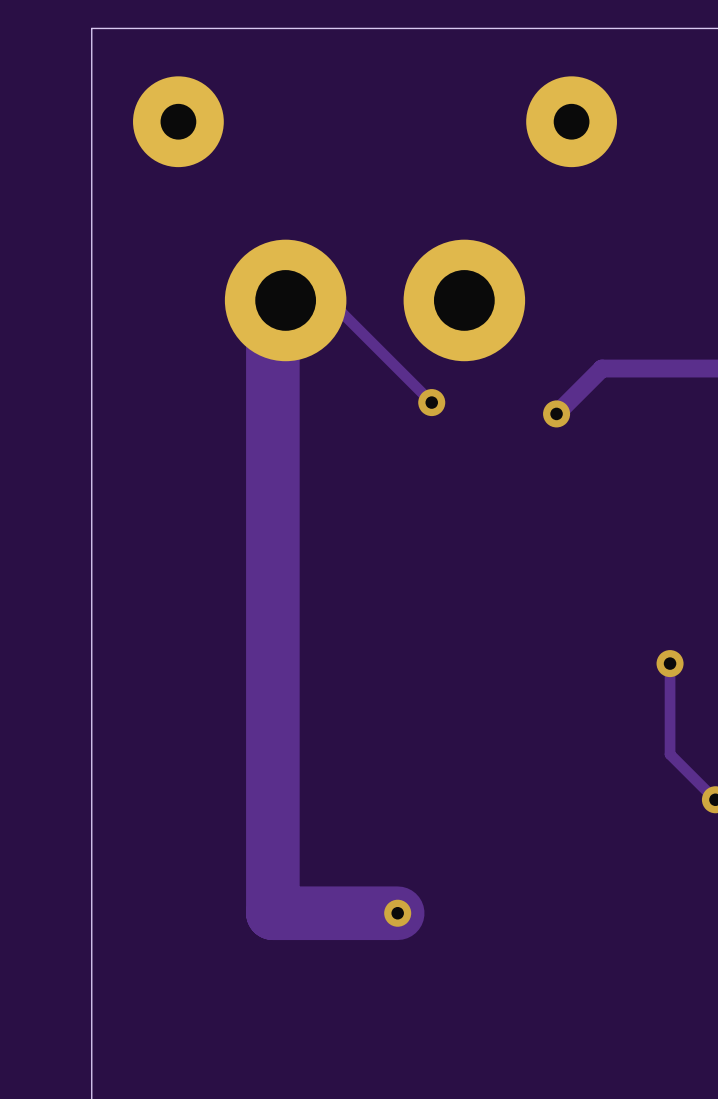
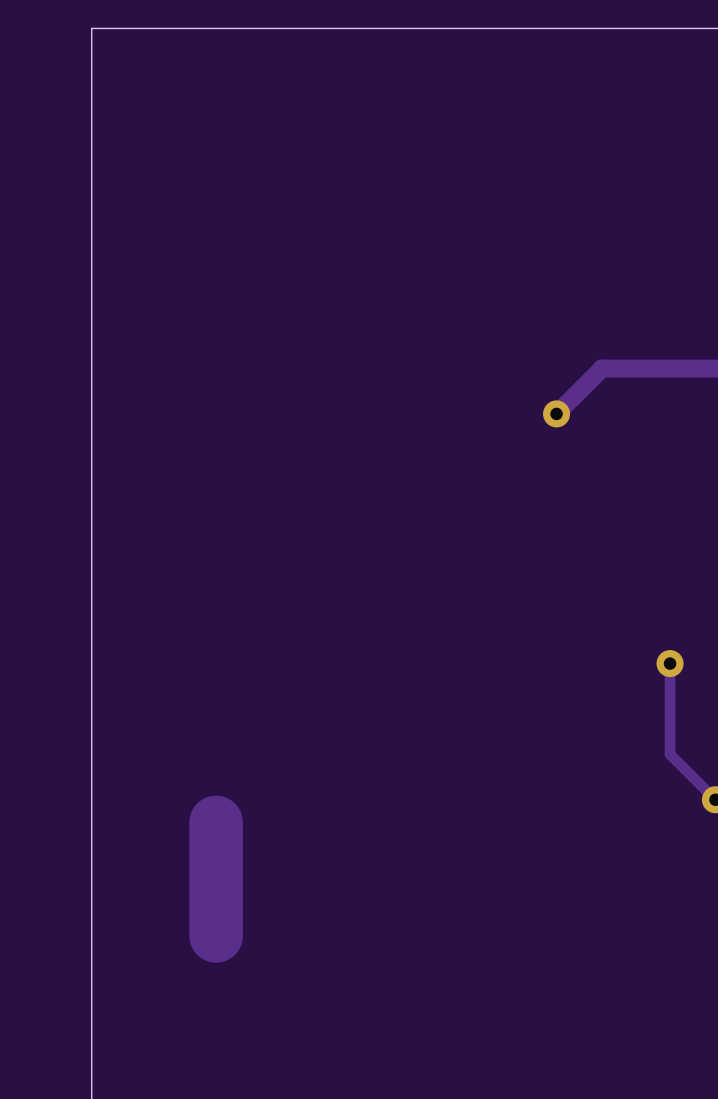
part: (375, 218) -> none
track: (272, 313) (272, 913) (397, 913) -> none
track: (272, 313) (342, 313) (431, 402) -> none
via: (431, 402) -> none
track: none -> (216, 822) (216, 935)
via: (397, 913) -> none

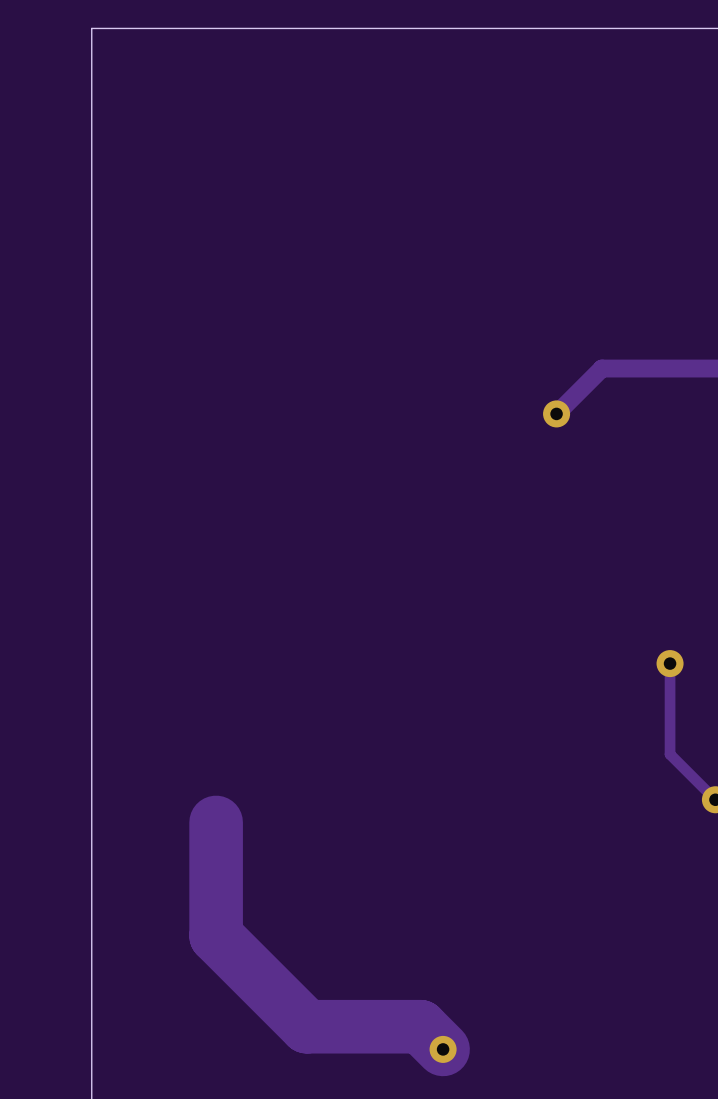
track: none -> (216, 935) (306, 1026) (420, 1026) (443, 1049)
via: none -> (443, 1049)

